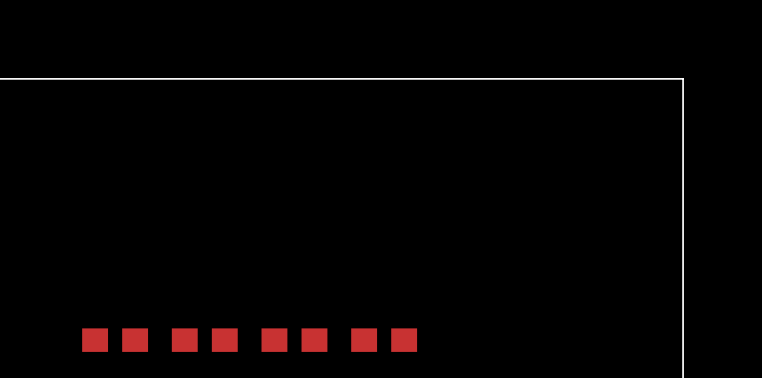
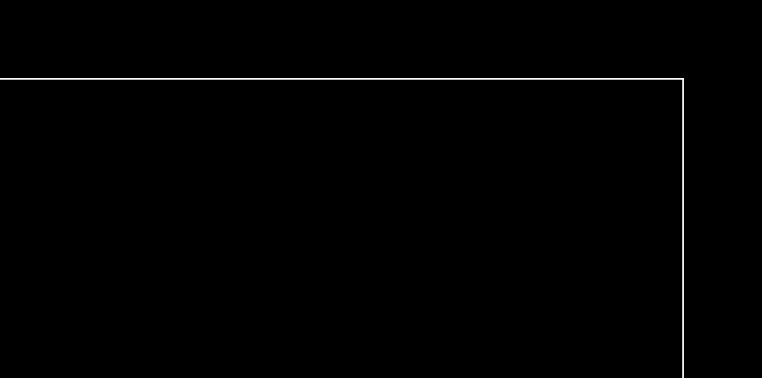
part: (115, 340) -> none
part: (204, 340) -> none
part: (294, 340) -> none
part: (384, 340) -> none

